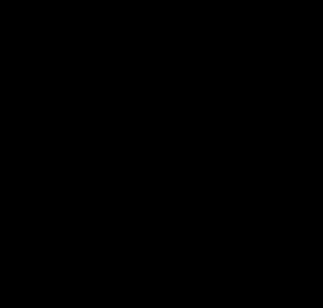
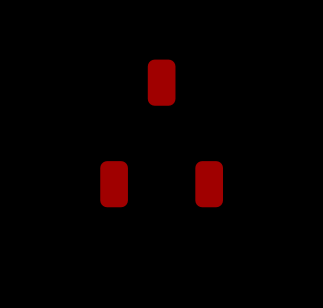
part: none -> (161, 133)

